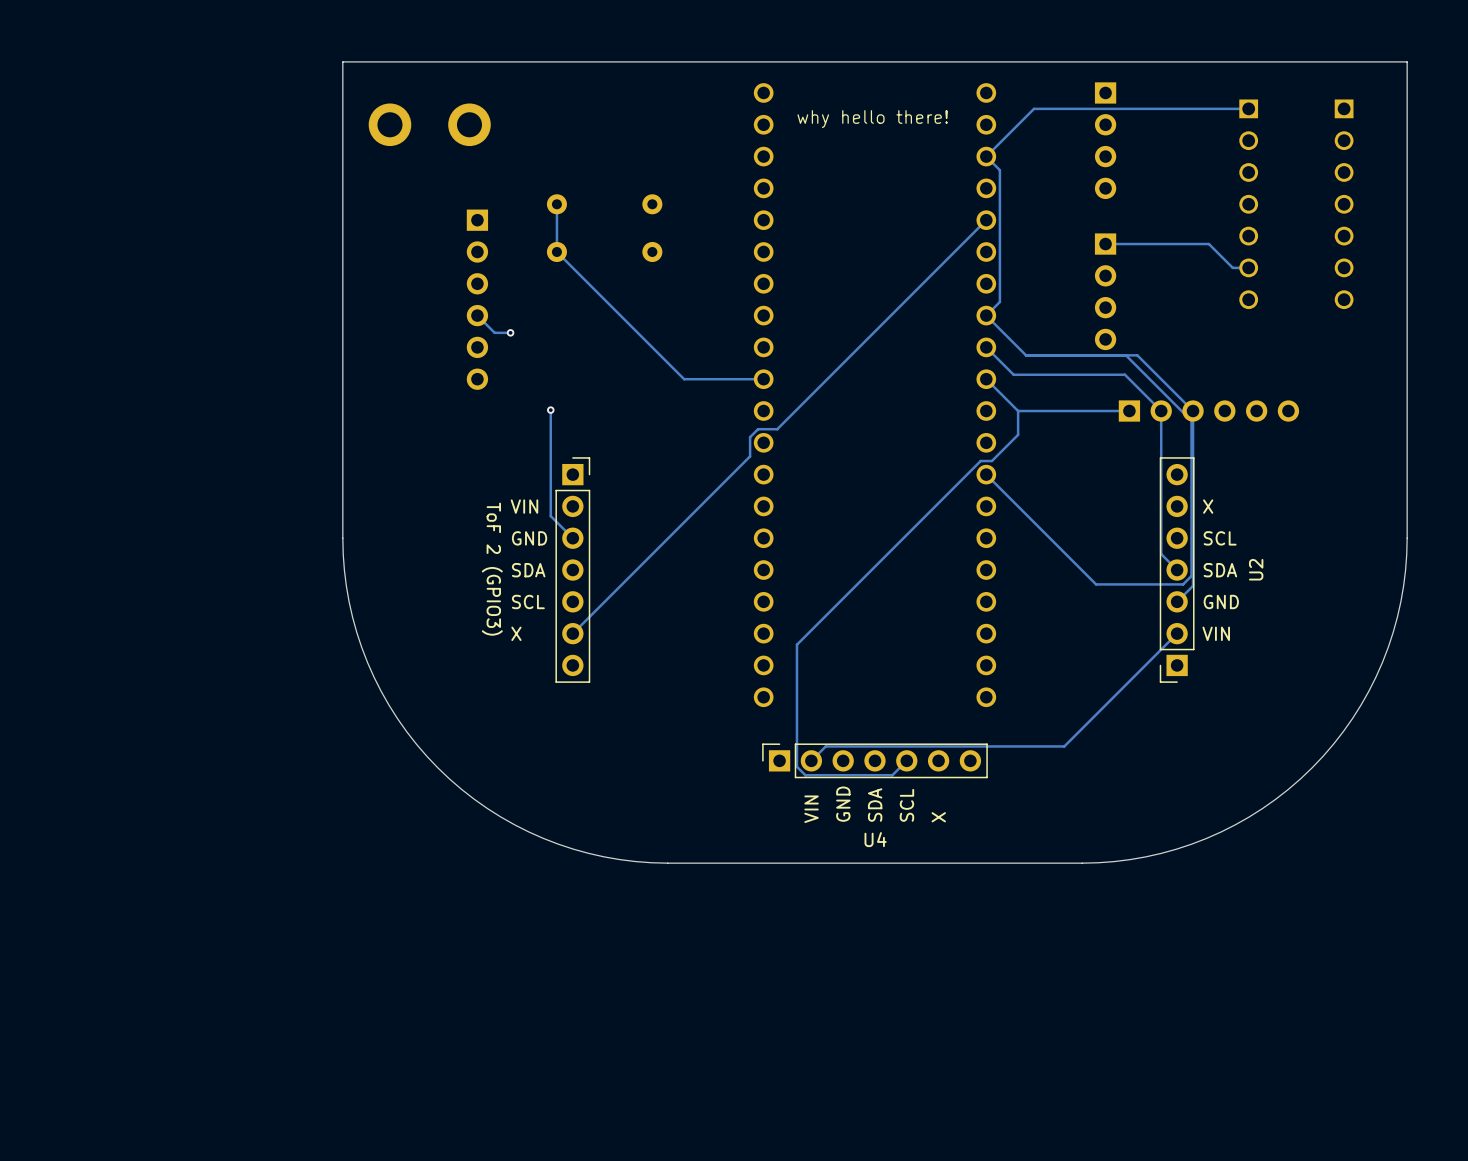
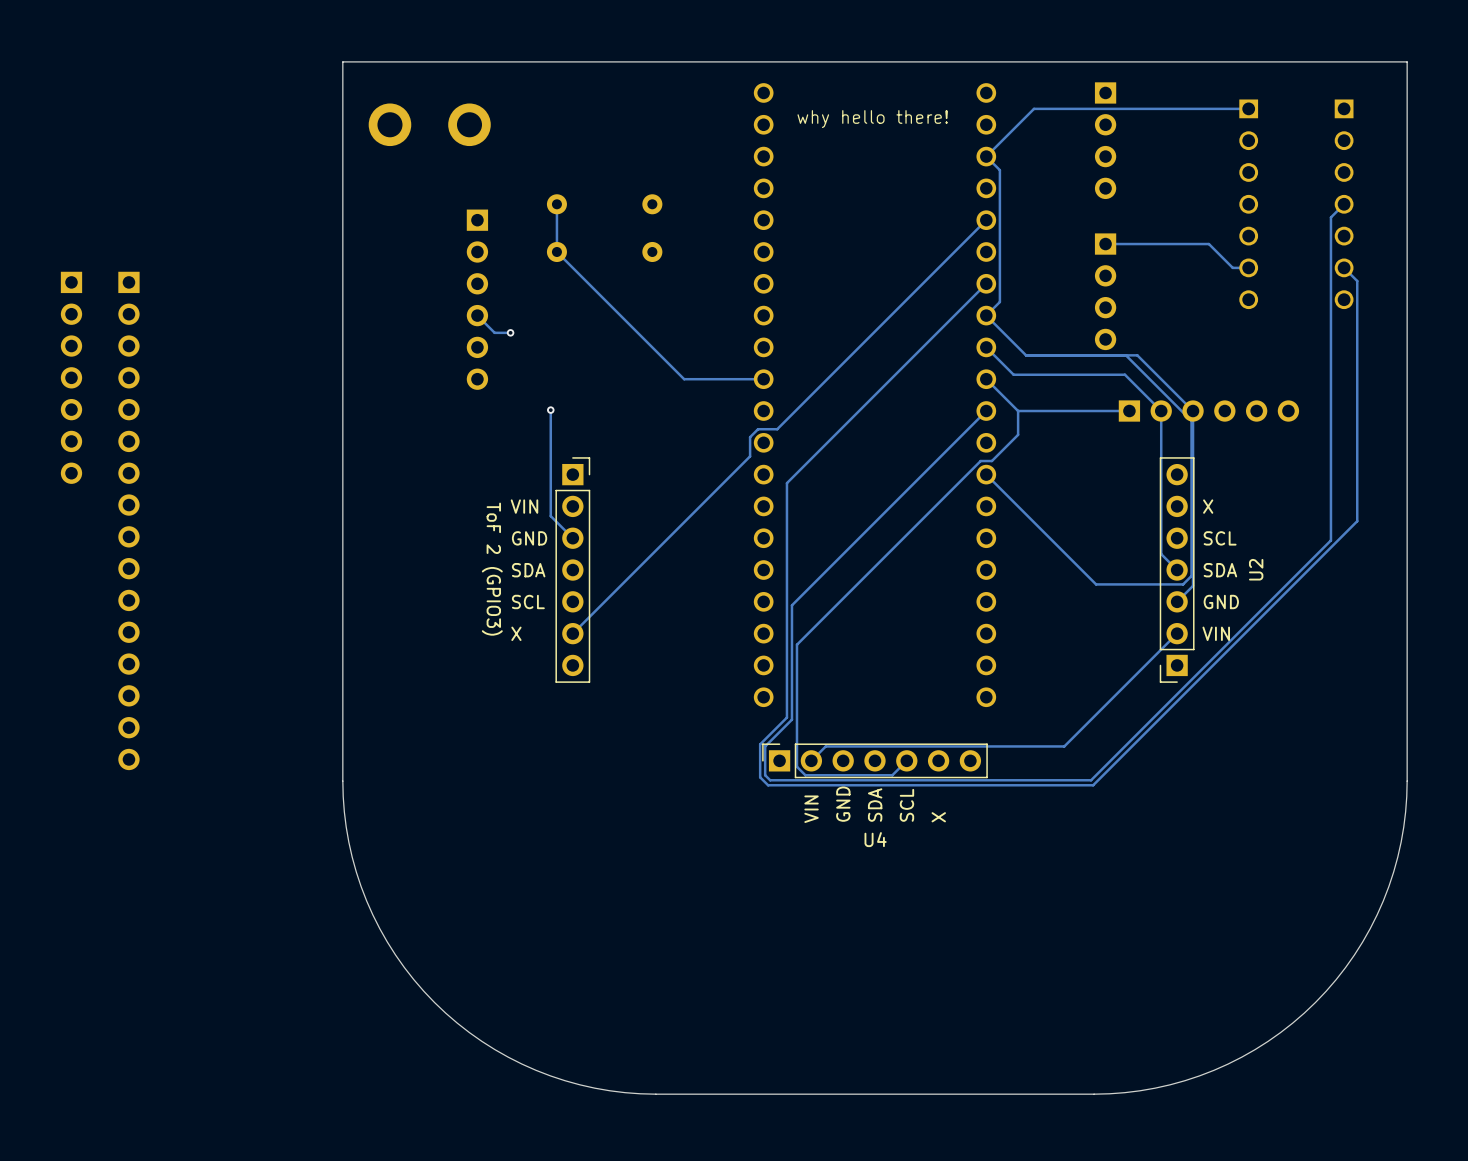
track: none -> (1344, 204) (1330, 217) (1330, 540) (1091, 780) (770, 780) (765, 775) (765, 746) (791, 719) (791, 605) (986, 411)
track: none -> (1344, 267) (1357, 281) (1357, 521) (1093, 785) (768, 785) (760, 777) (760, 744) (786, 717) (786, 483) (986, 283)
part: none -> (71, 377)
part: none -> (128, 520)
board edge: (1407, 538) (1405, 570) (1400, 601) (1393, 632) (1382, 662) (1368, 691) (1352, 718) (1333, 744) (1311, 767) (1288, 789) (1262, 808) (1235, 824) (1206, 838) (1176, 849) (1145, 856) (1114, 861) (1082, 863) (651, 862) (620, 859) (588, 853) (543, 838) (500, 816) (461, 789) (427, 756) (397, 718) (374, 677) (356, 632) (346, 585) (342, 538) -> (1407, 538) (1405, 811) (1401, 842) (1393, 872) (1383, 900) (1370, 928) (1345, 967) (1315, 1002) (1280, 1032) (1255, 1049) (1213, 1070) (1170, 1084) (1140, 1090) (1094, 1094) (625, 1092) (579, 1084) (536, 1070) (494, 1049) (469, 1032) (434, 1002) (413, 979) (395, 955) (379, 928) (366, 900) (352, 857) (346, 827) (343, 796) (342, 538)

